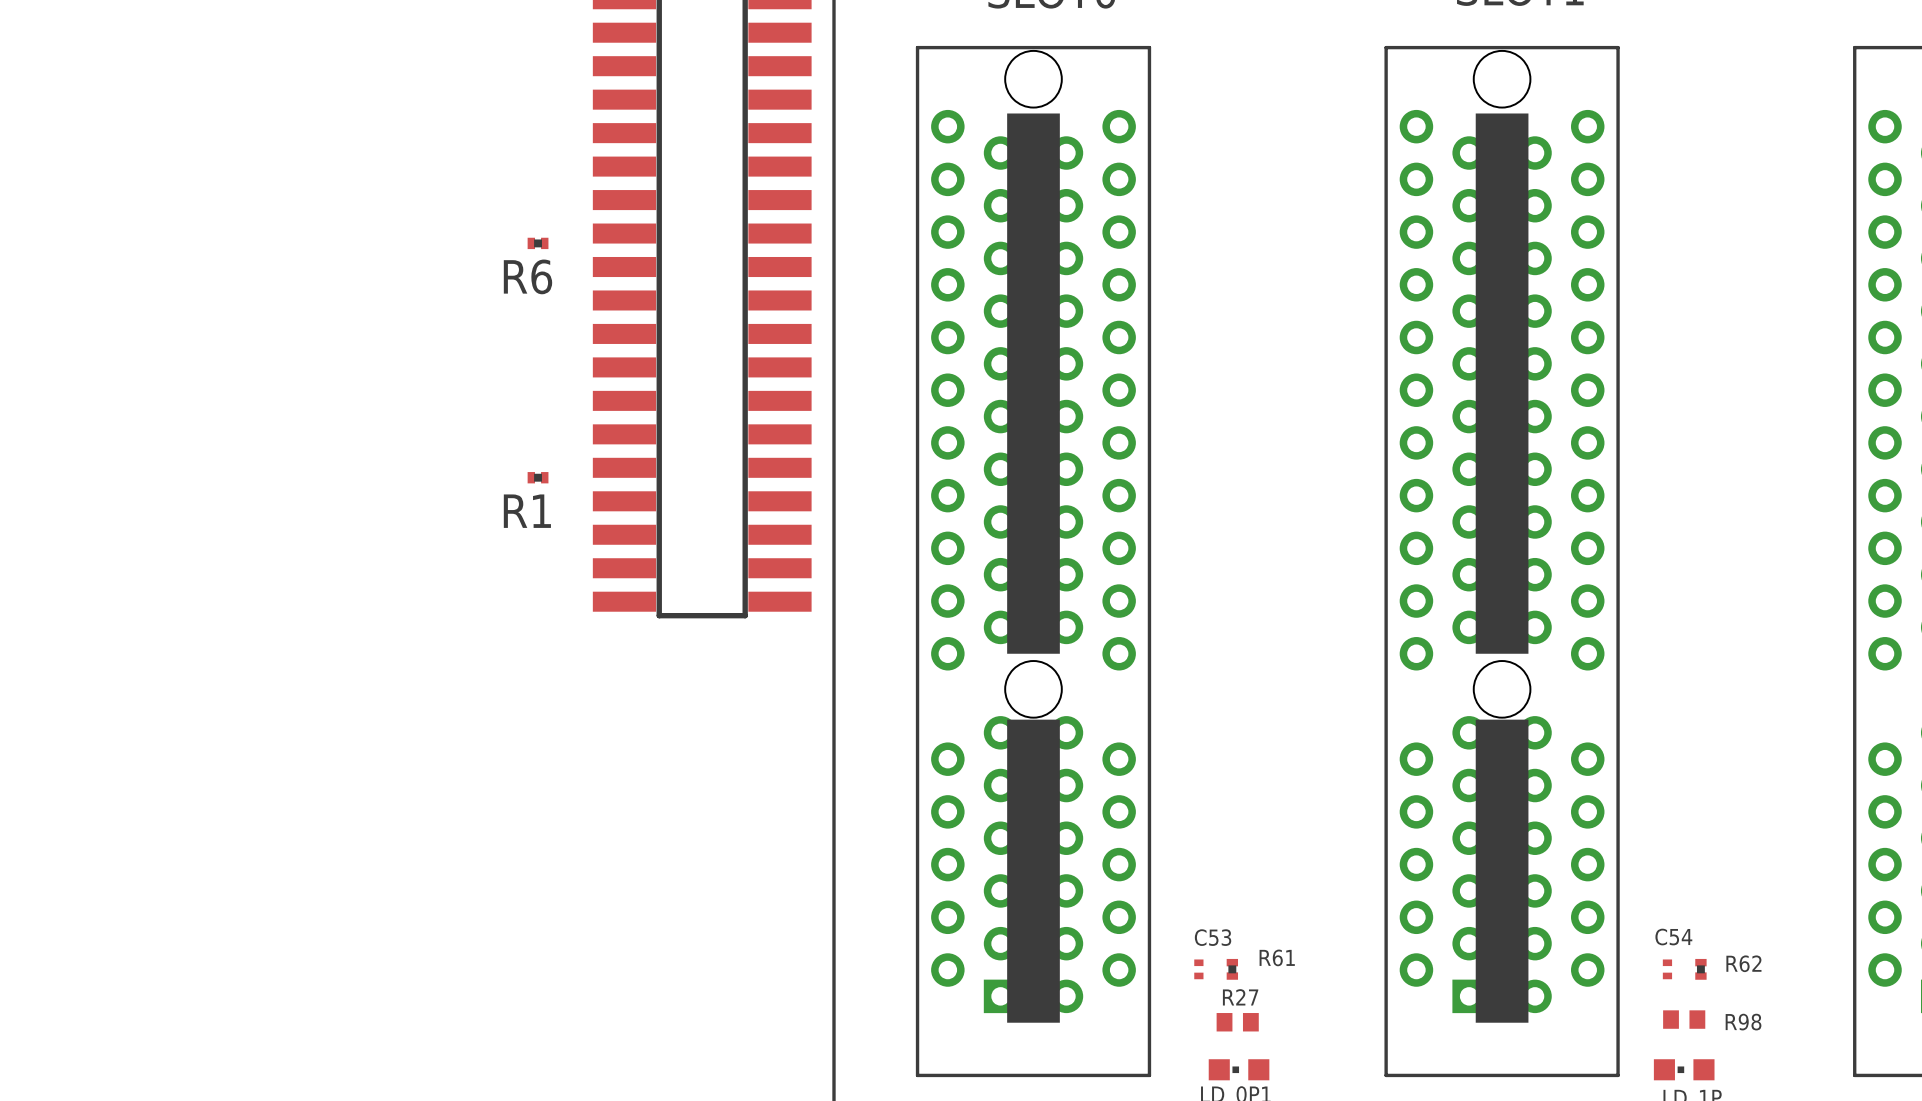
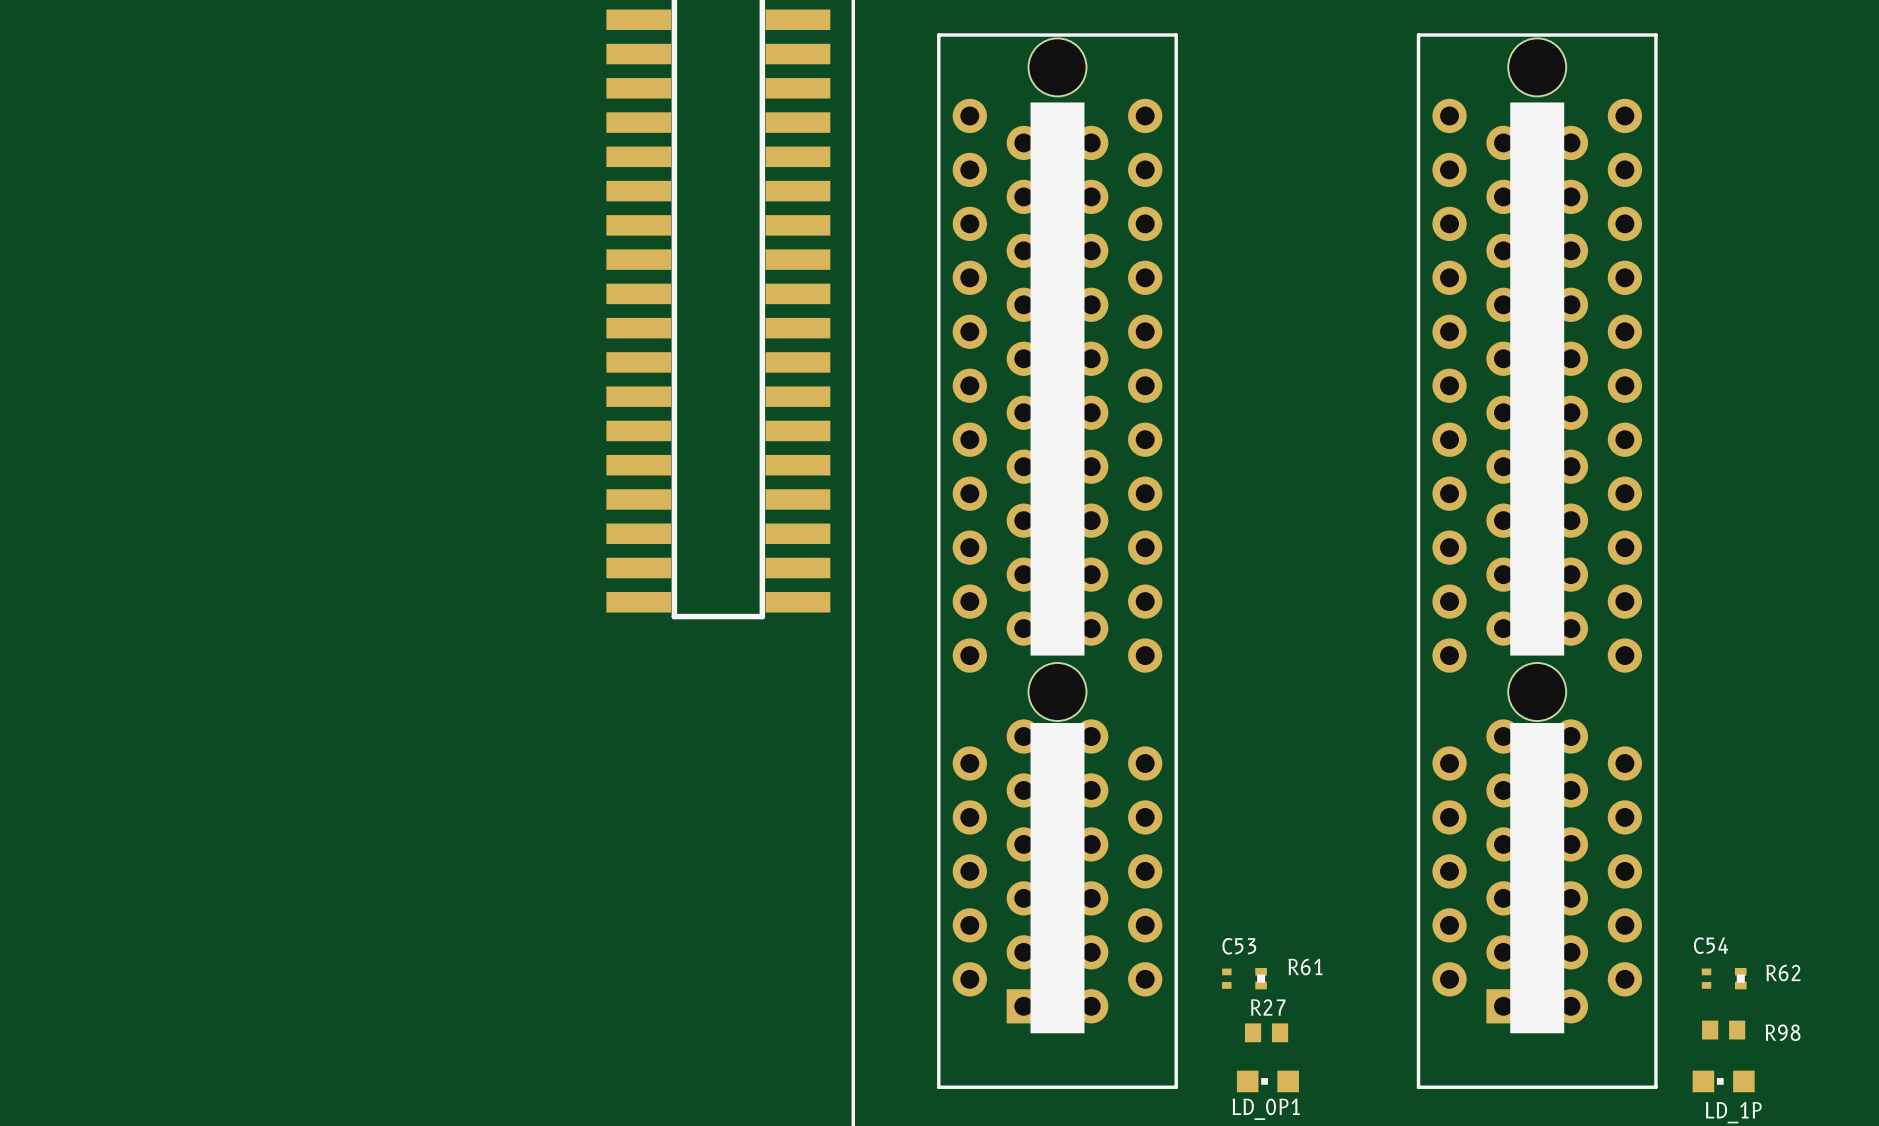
R6: (538, 243) -> none
R1: (538, 477) -> none

